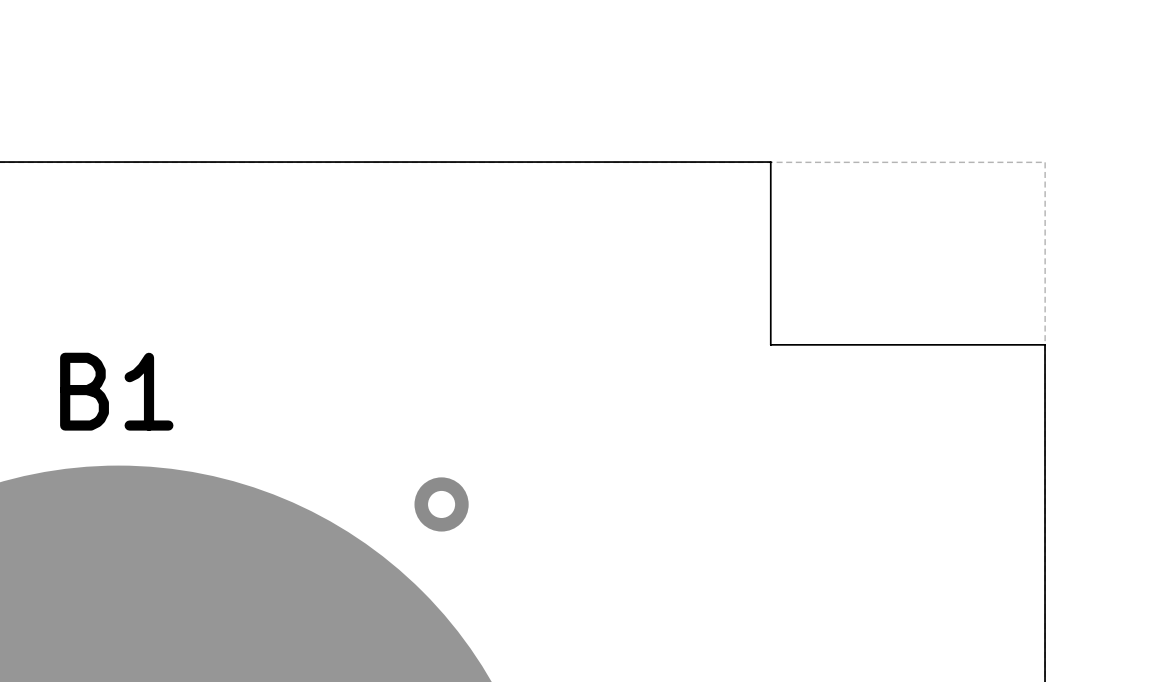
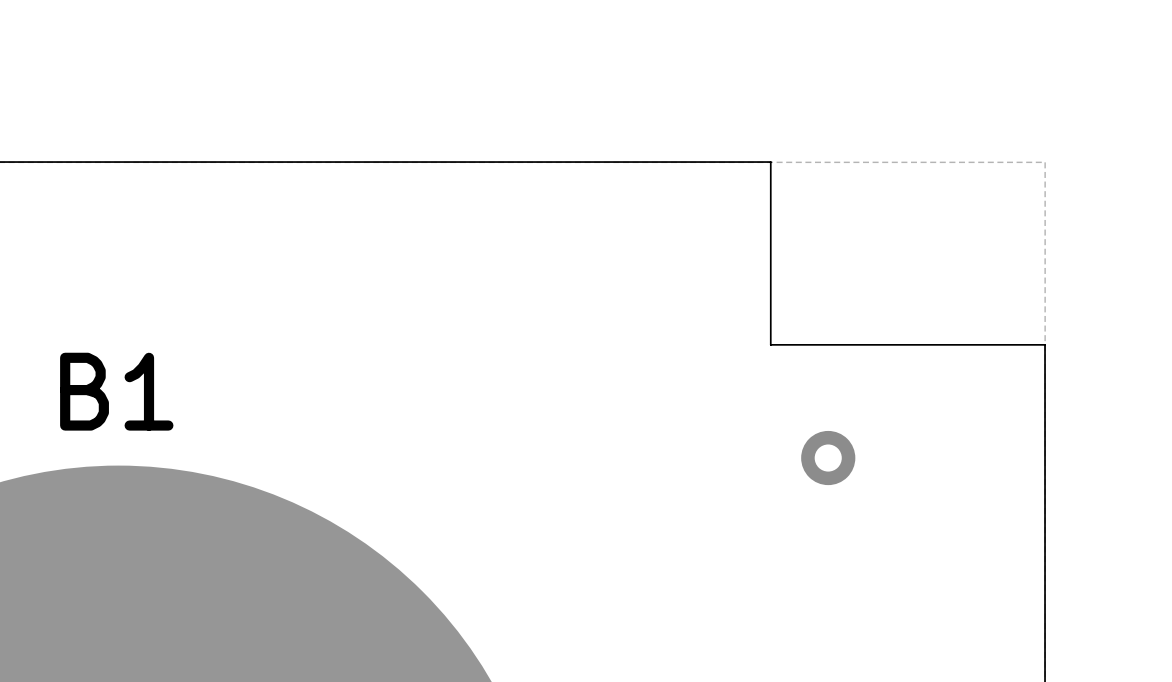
via position: (441, 504) -> (828, 458)

